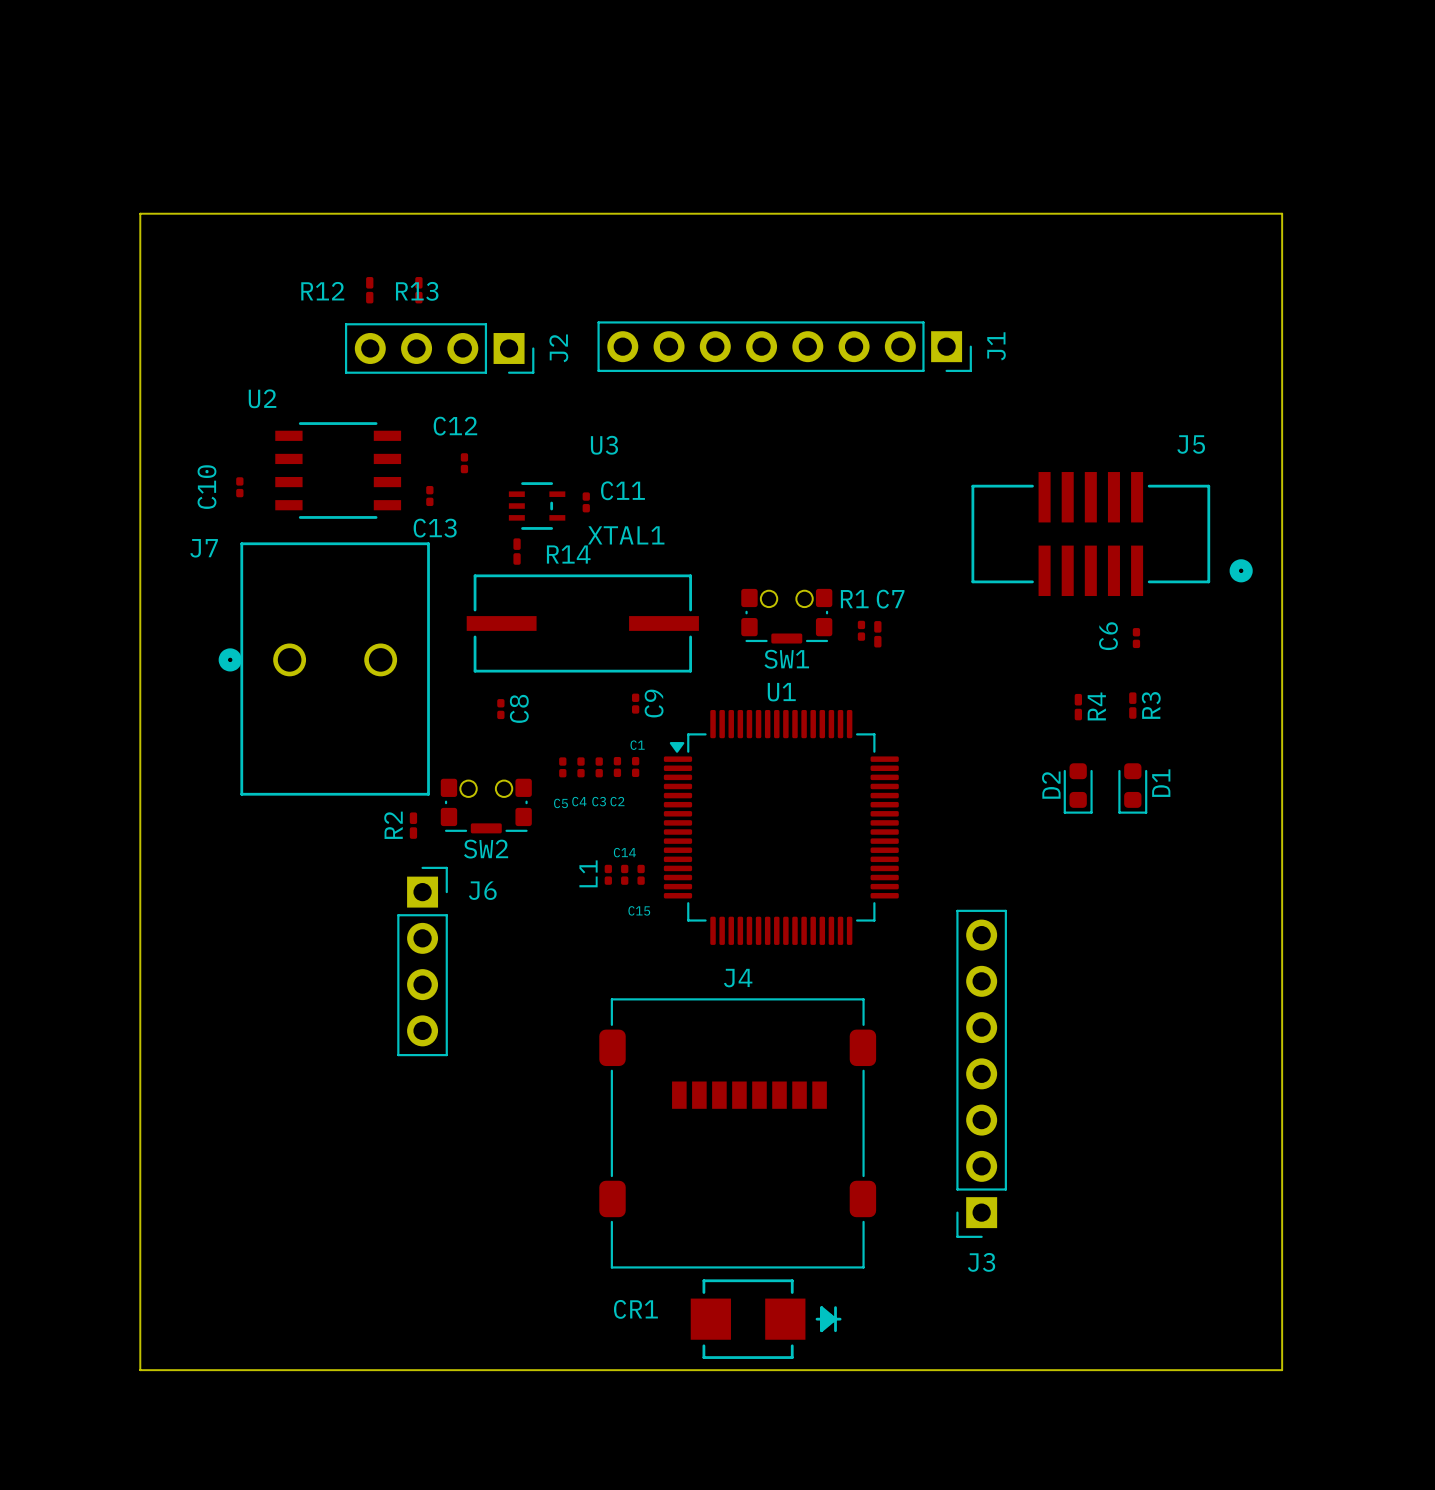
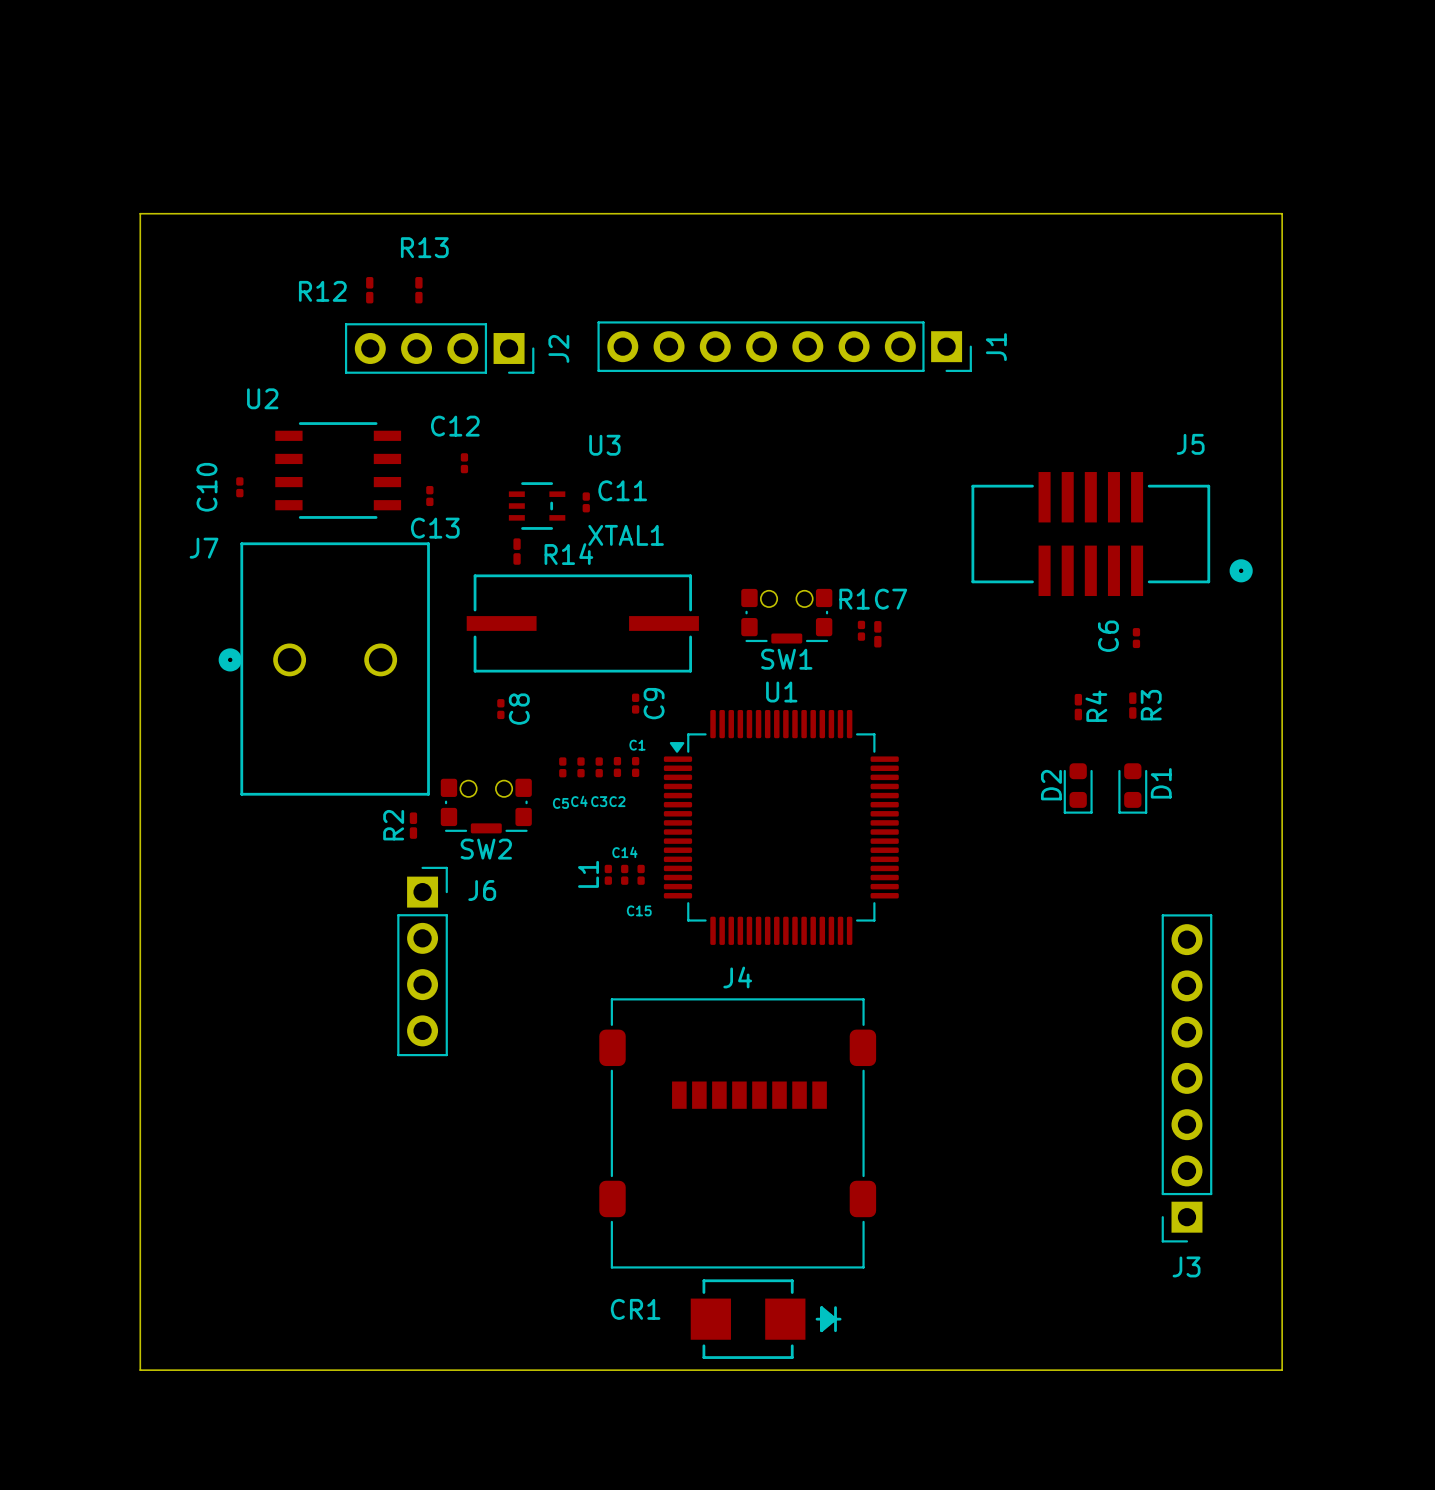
R13 name position: R13 (417, 291) -> R13 (424, 247)
J3 position: (981, 1073) -> (1186, 1078)

